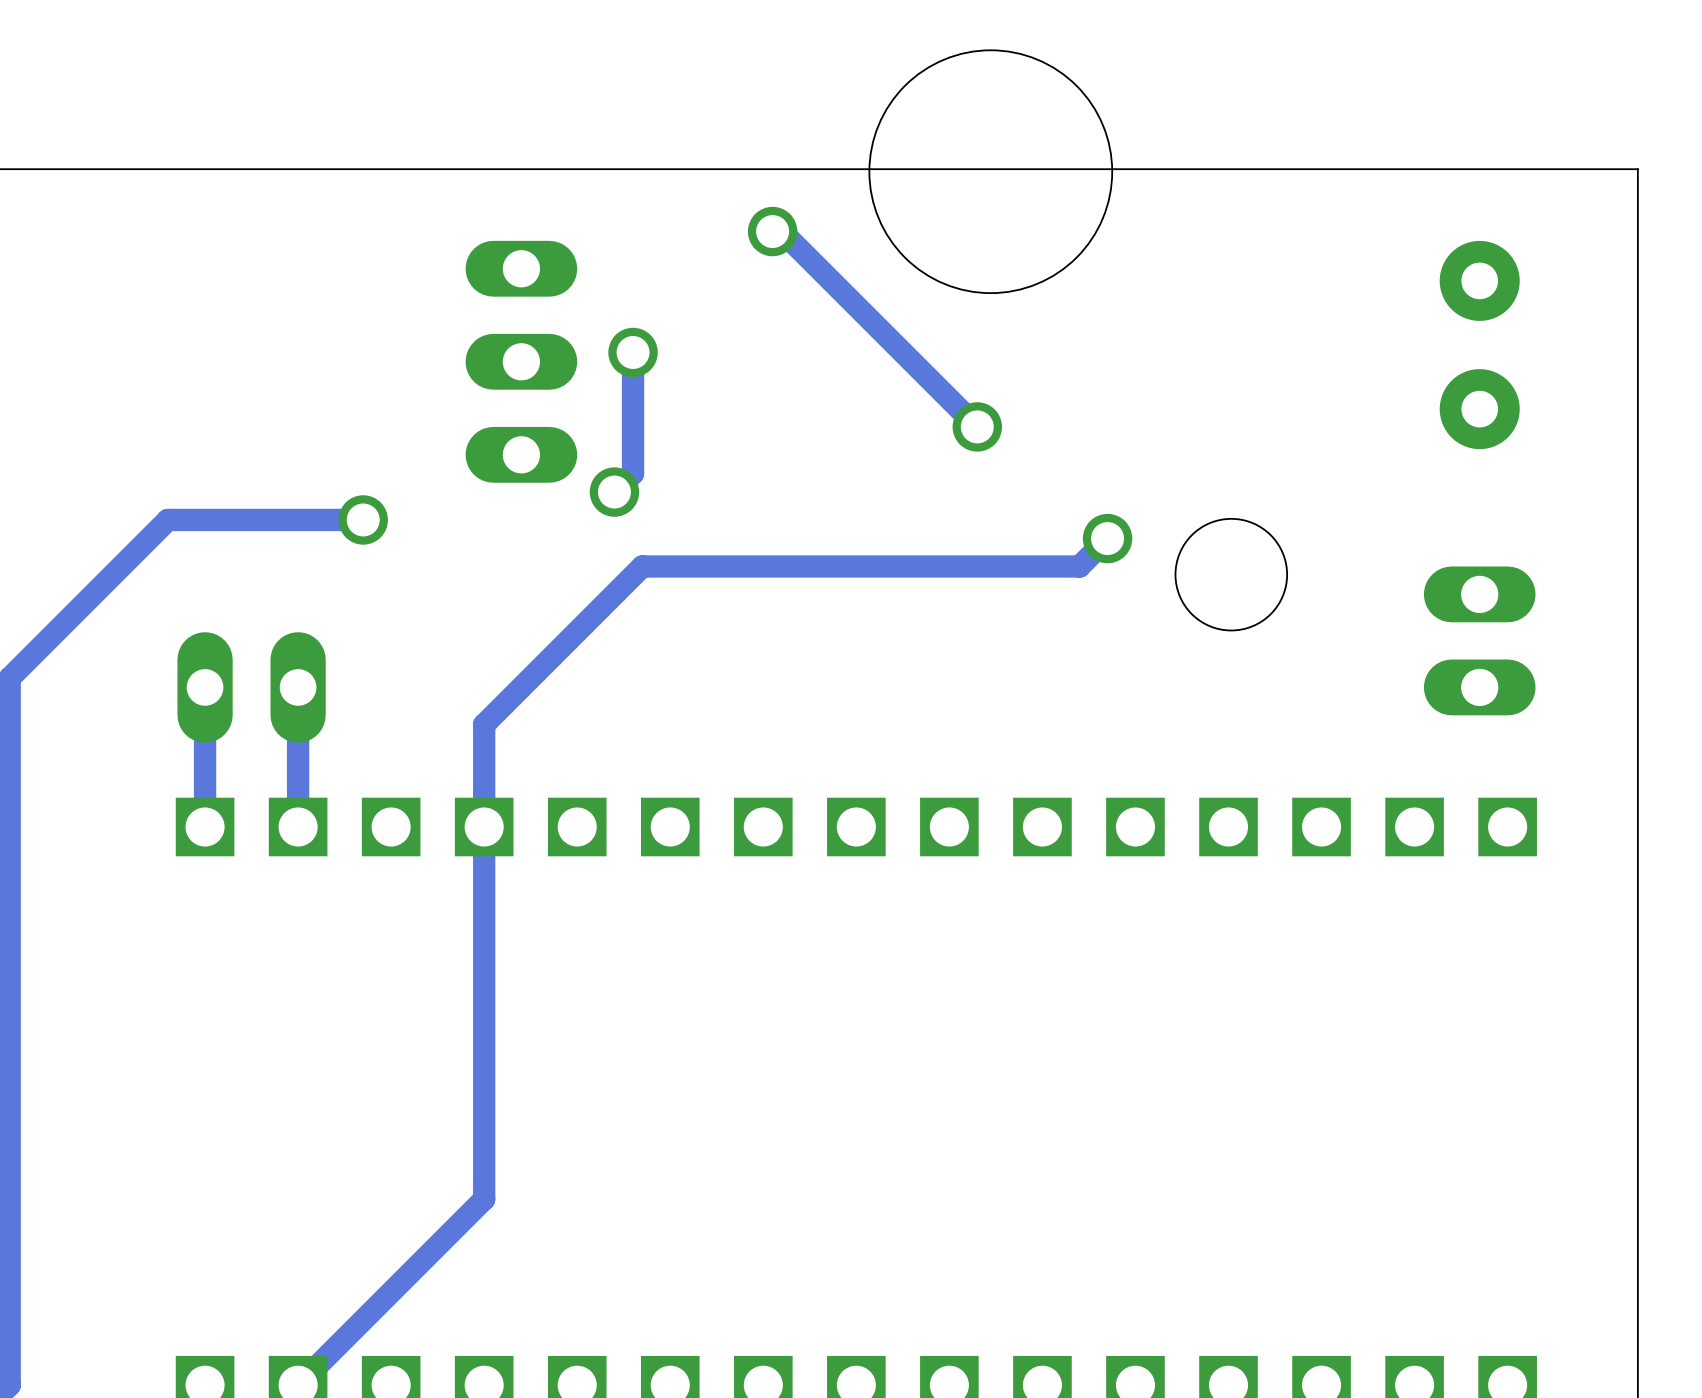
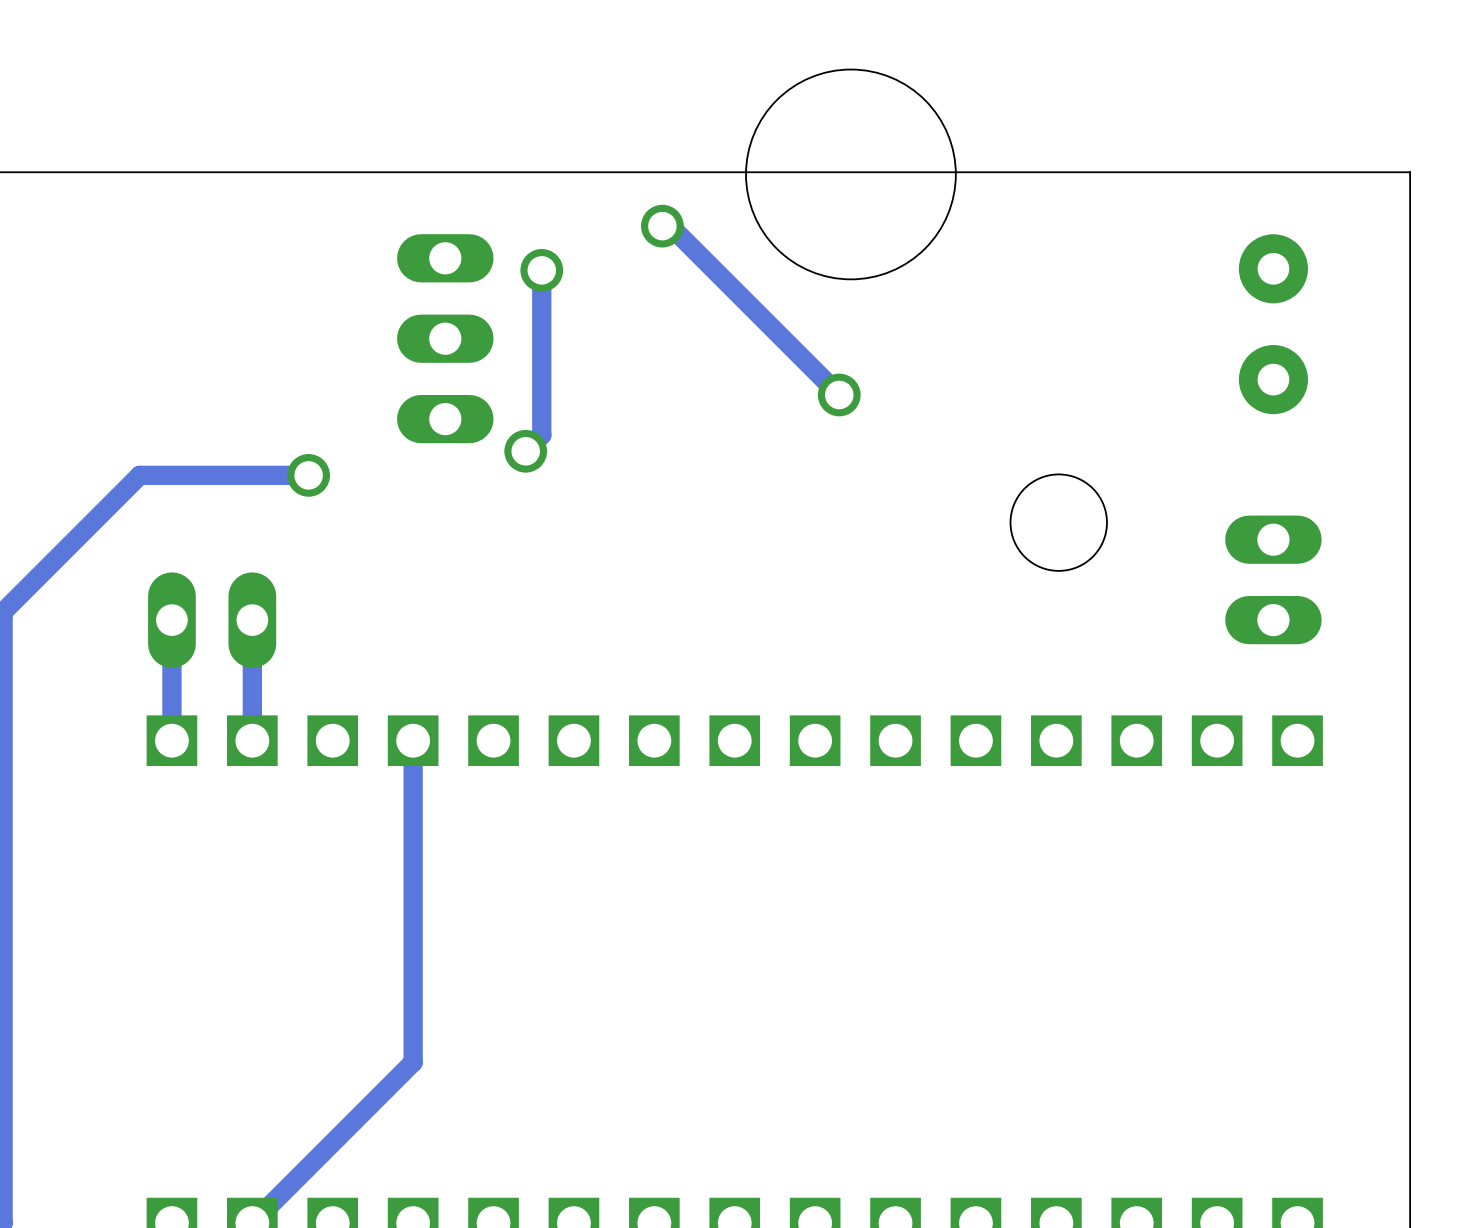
track: none -> (541, 270) (541, 330)
via position: (633, 352) -> (541, 270)
track: (1107, 538) (1079, 566) (642, 566) (484, 724) (484, 827) -> none
via: (1107, 538) -> none

